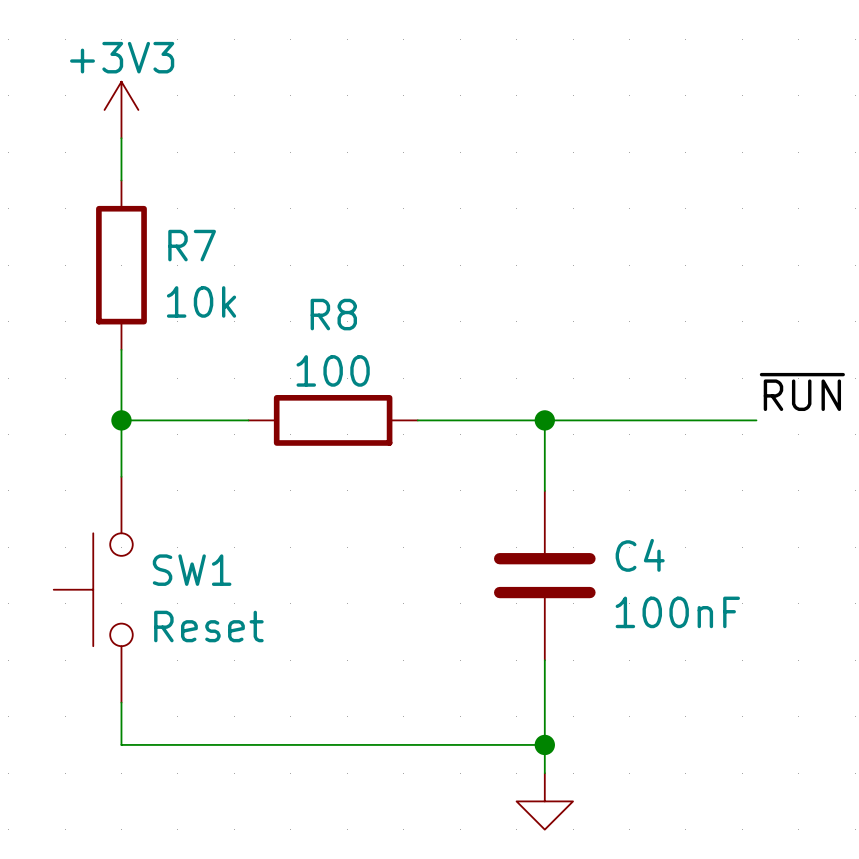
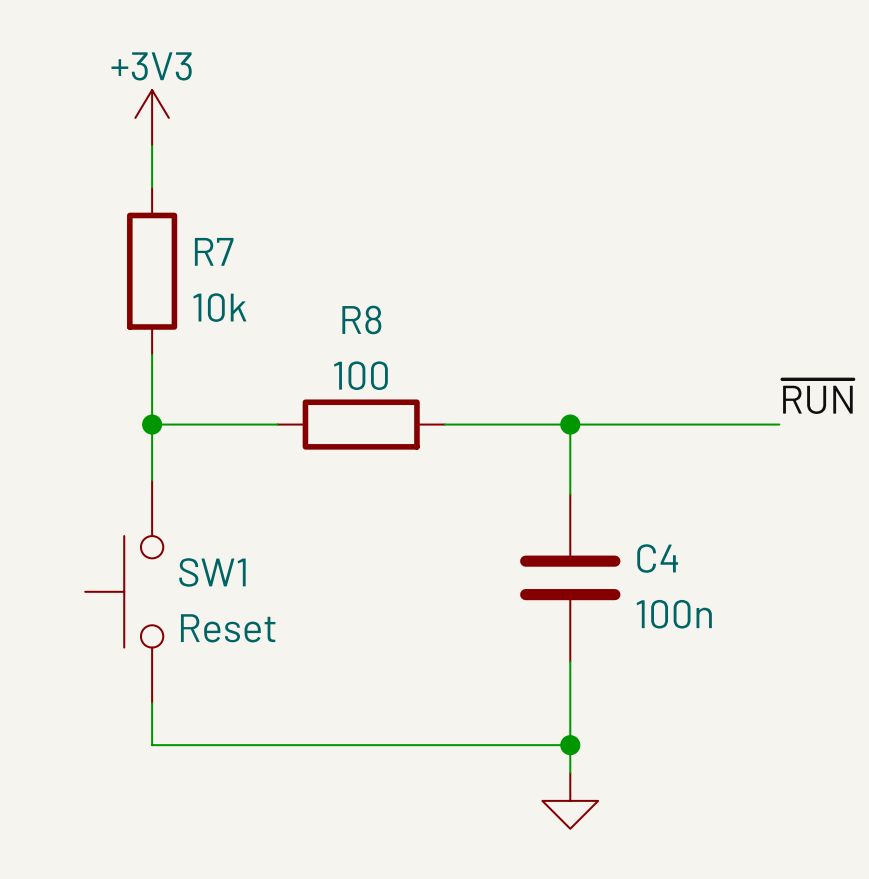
C4 value: 100nF (677, 612) -> 100n (674, 614)

